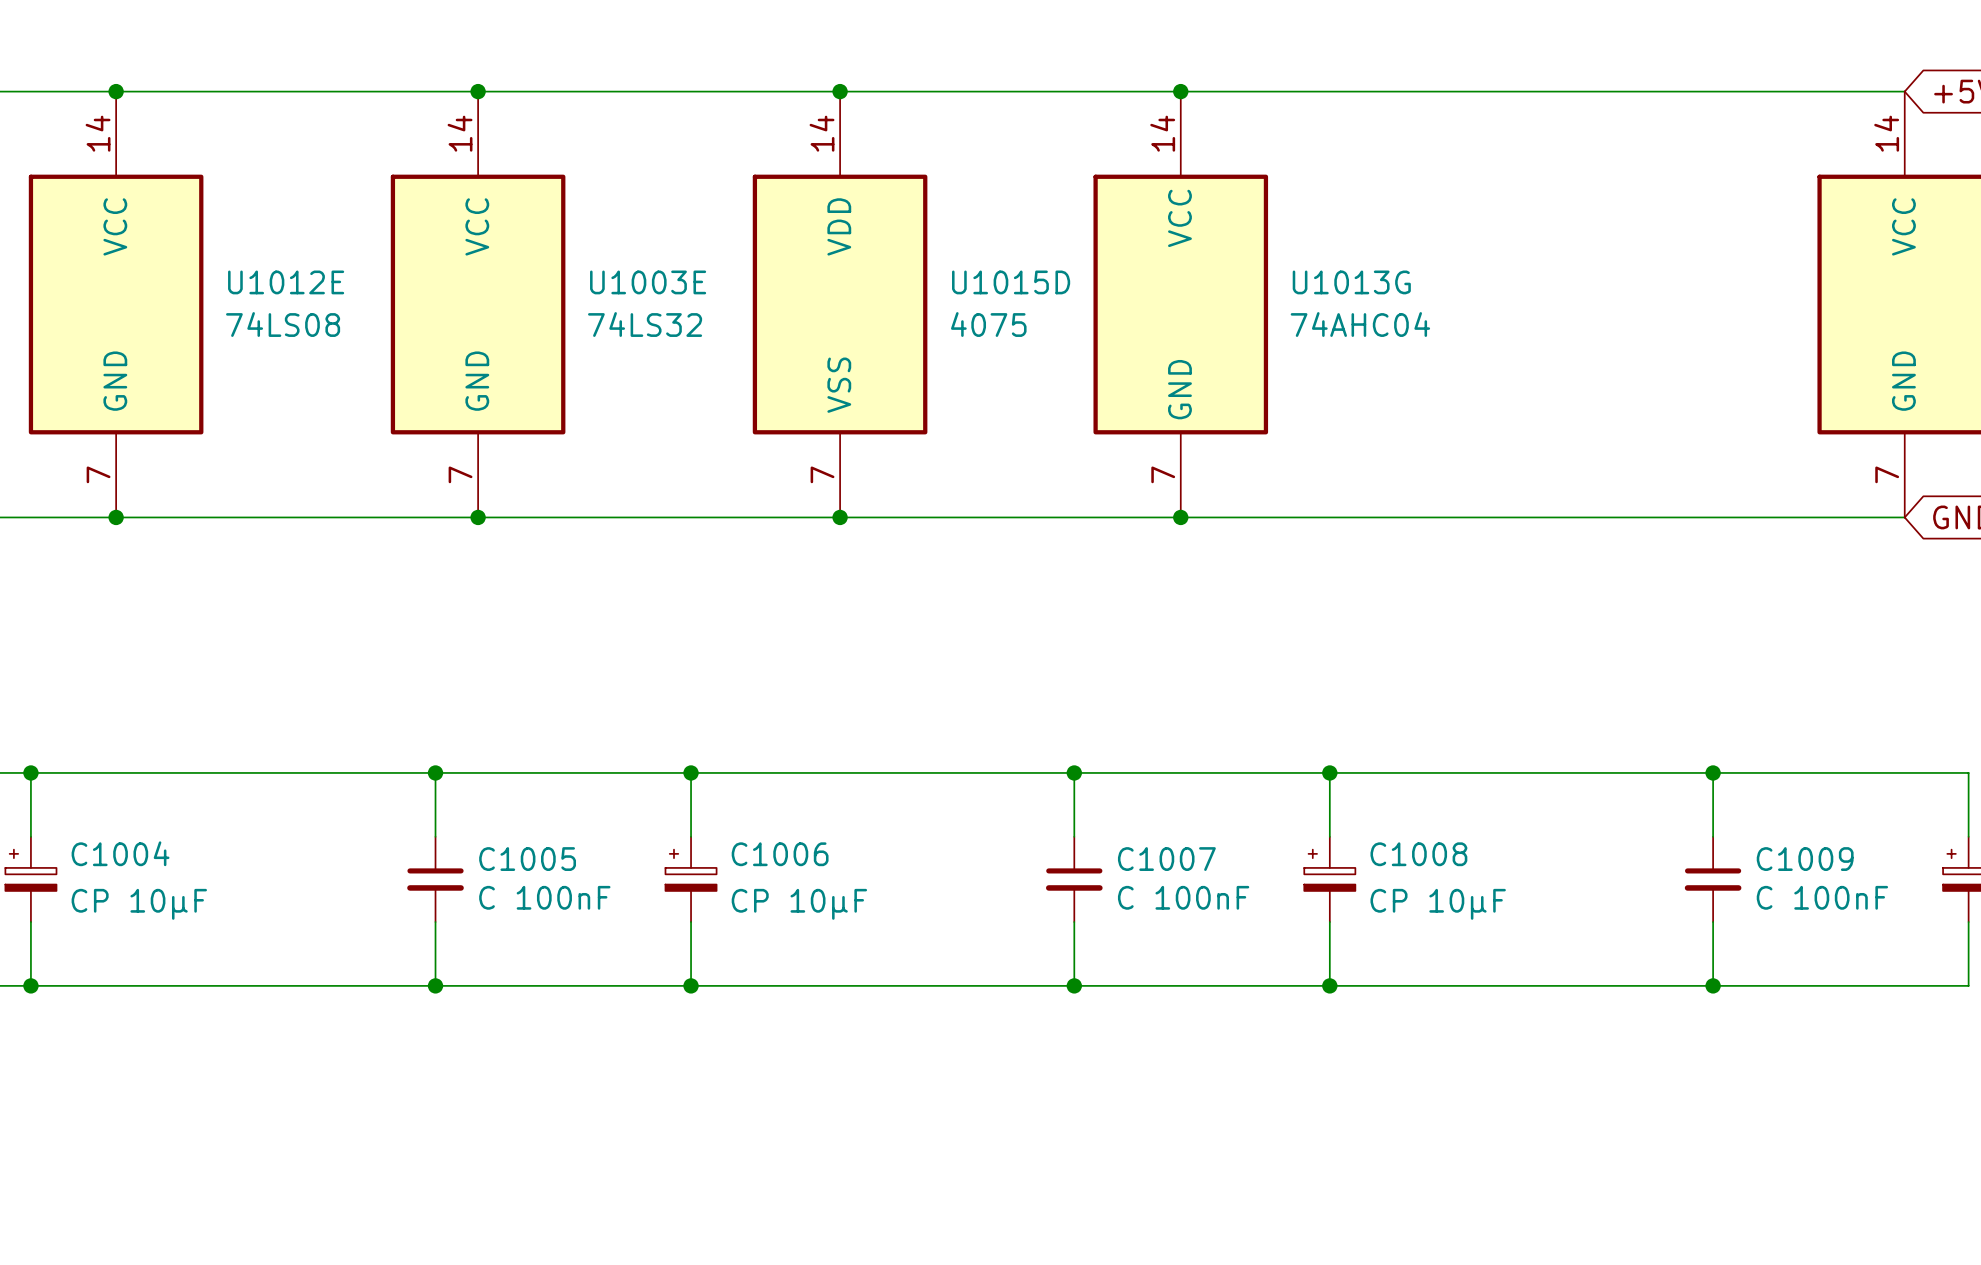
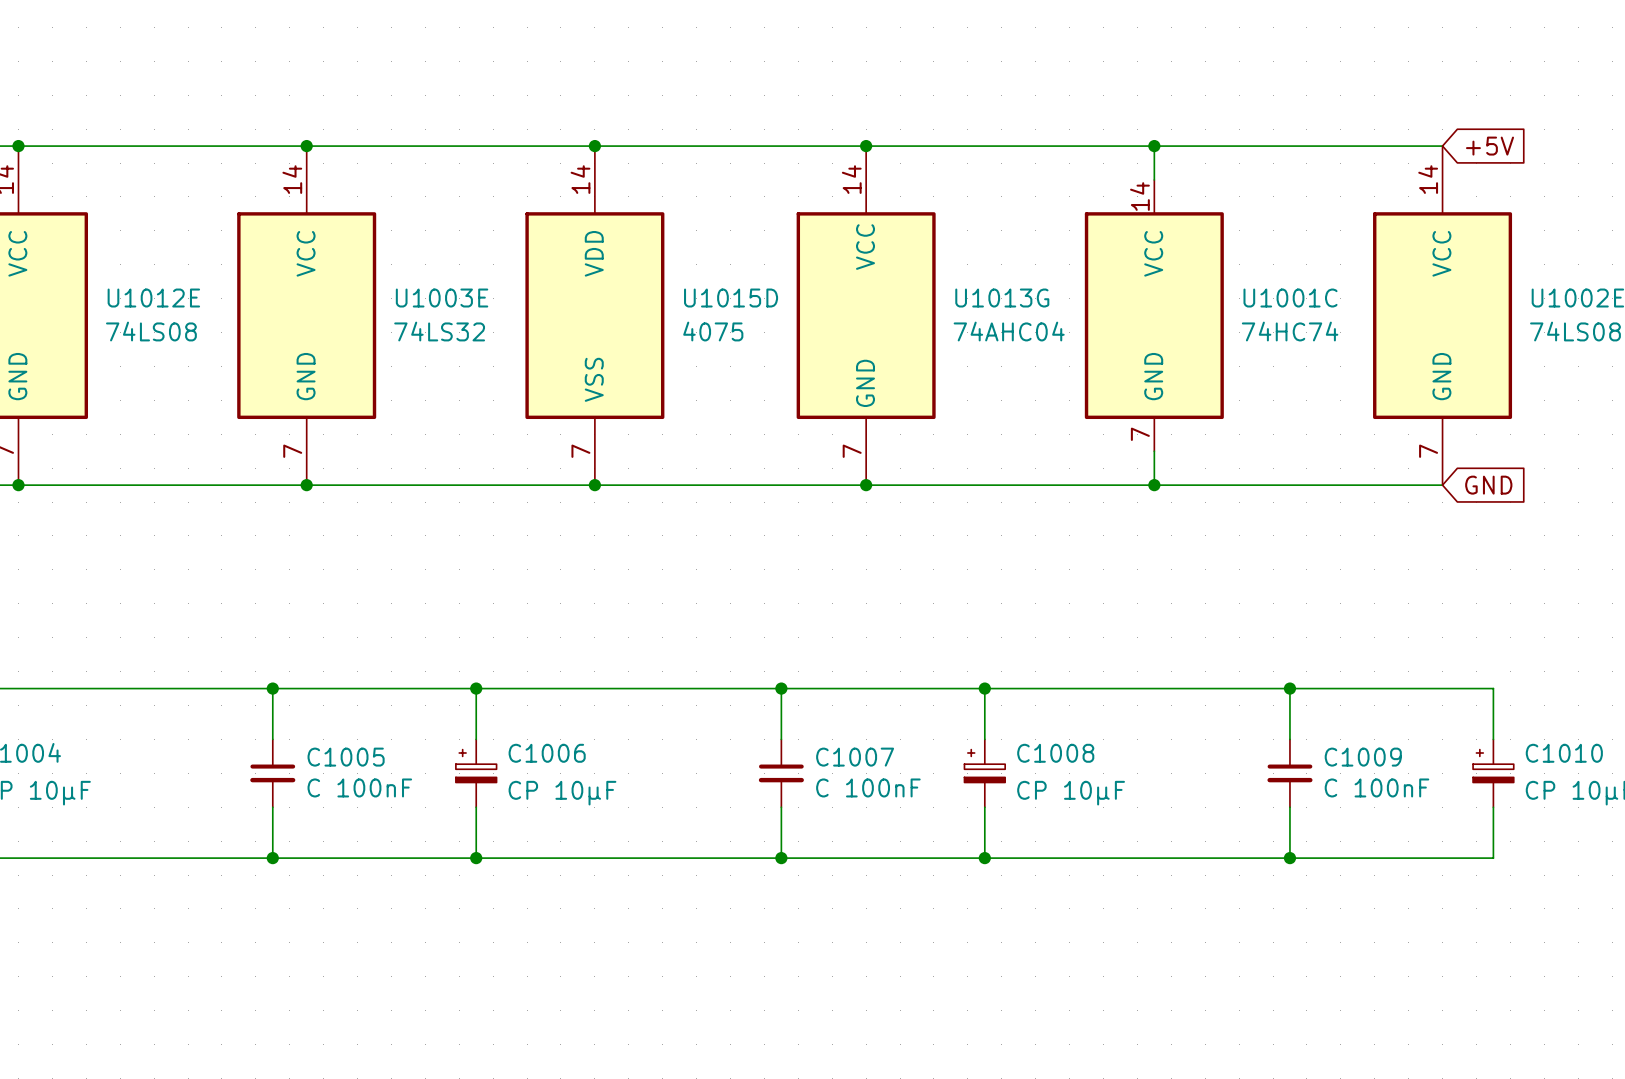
wire: none -> (1154, 146) (1154, 179)
junction: none -> (1154, 146)
U1001C: none -> 74HC74 (1154, 315)
wire: none -> (1154, 451) (1154, 485)
junction: none -> (1154, 485)

